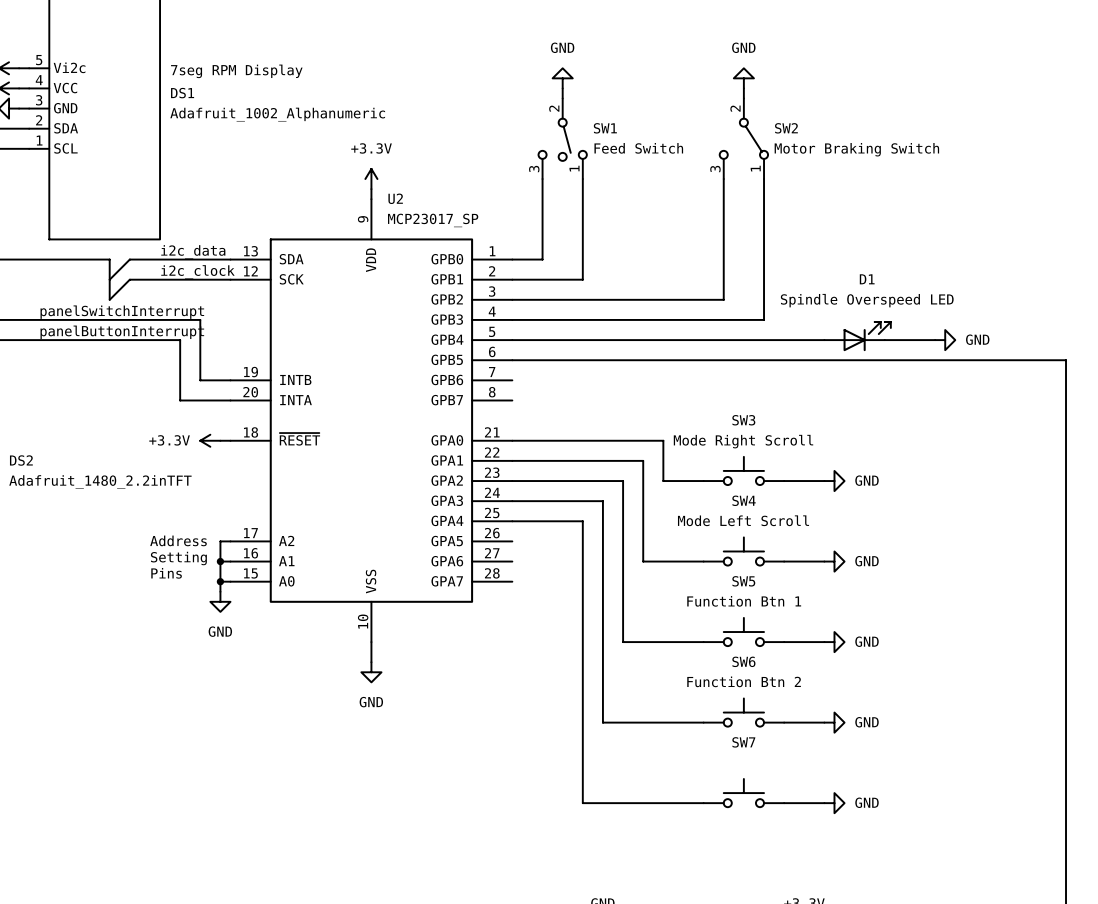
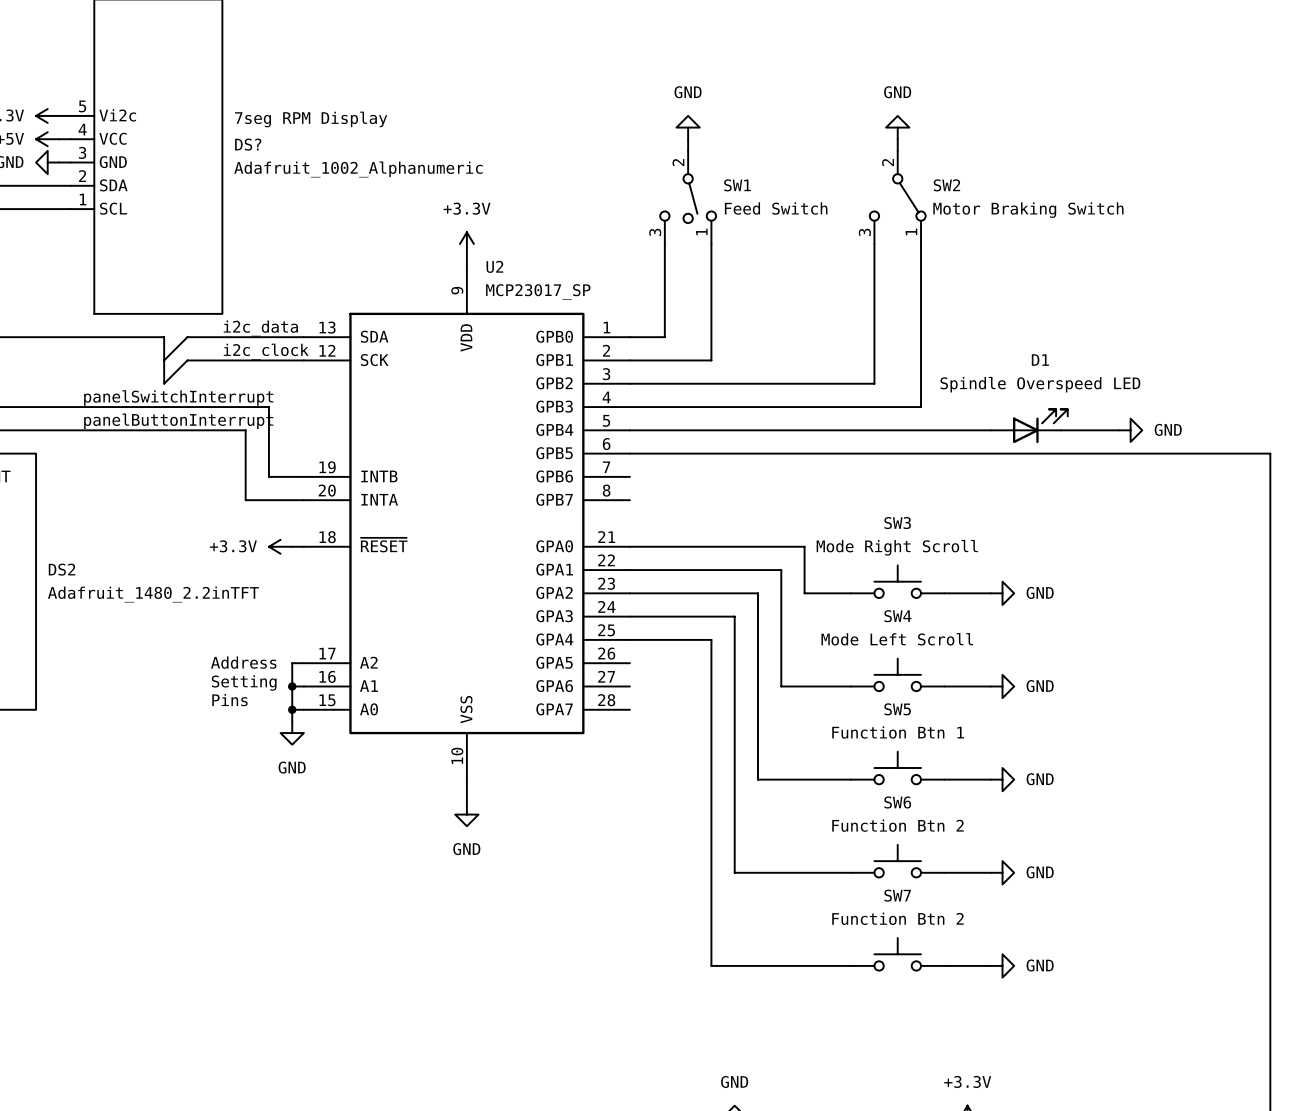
DS1 name: DS1 (182, 93) -> DS? (248, 144)
SW7 value: none -> Function Btn 2 (897, 918)

